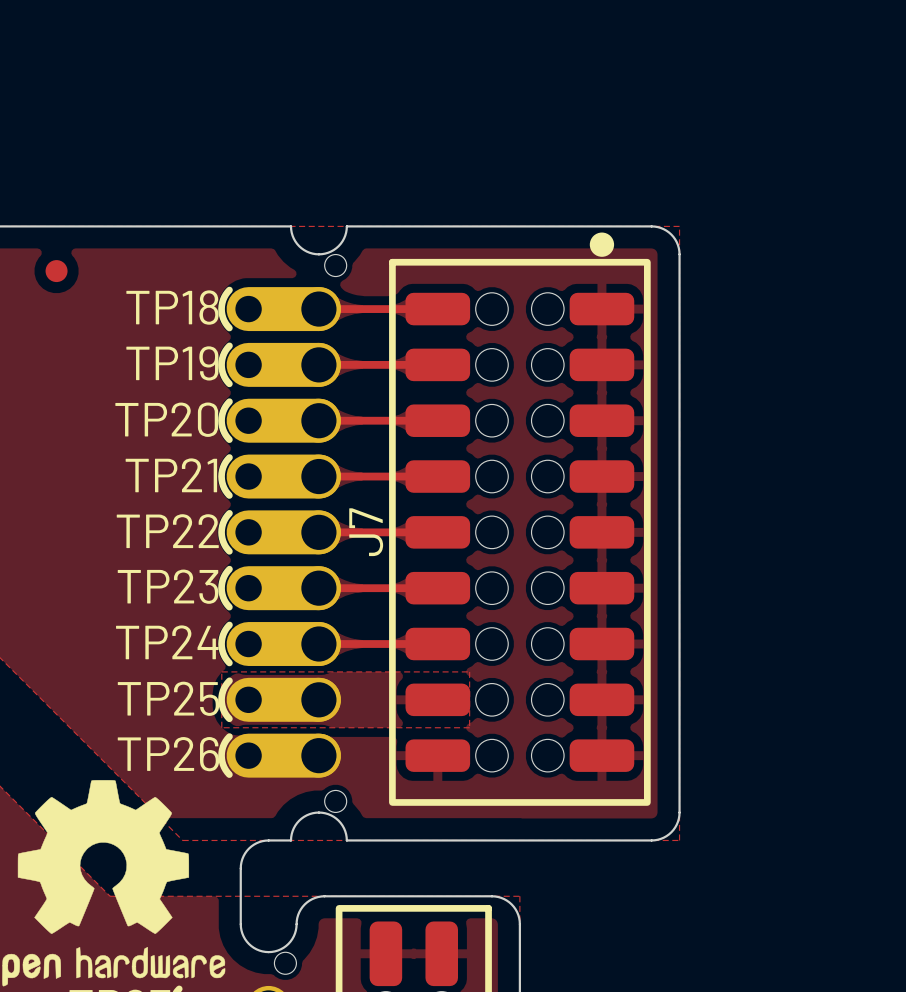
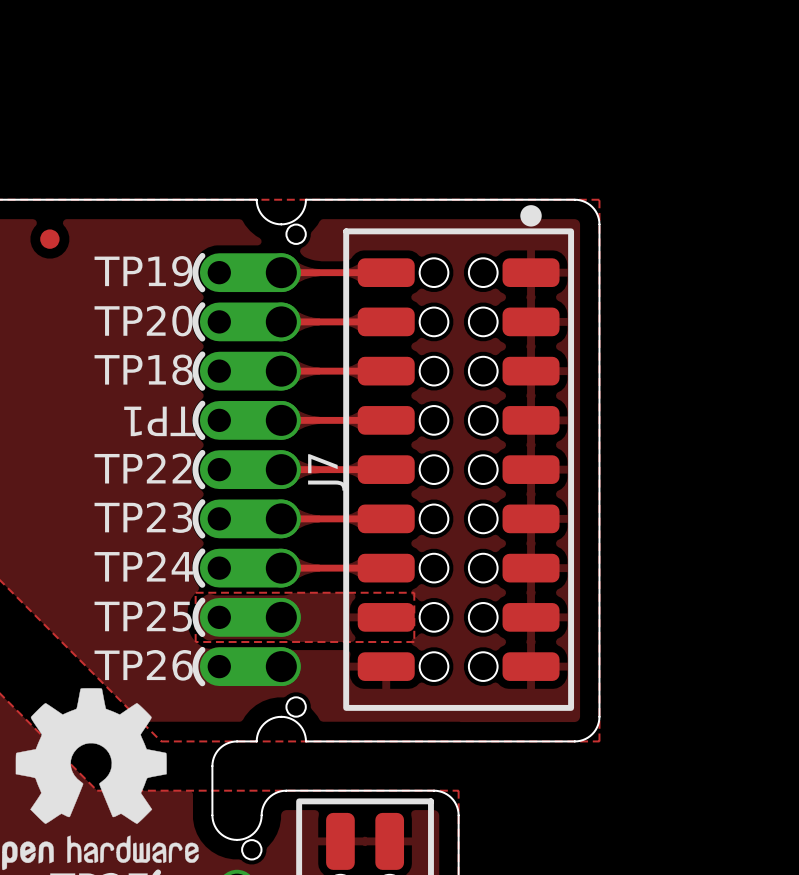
TP18 name: TP18 (172, 307) -> TP19 (143, 271)
TP19 name: TP19 (172, 363) -> TP20 (143, 321)
TP20 name: TP20 (166, 419) -> TP18 (143, 369)
TP21 name: TP21 (171, 475) -> TP1 (159, 421)

